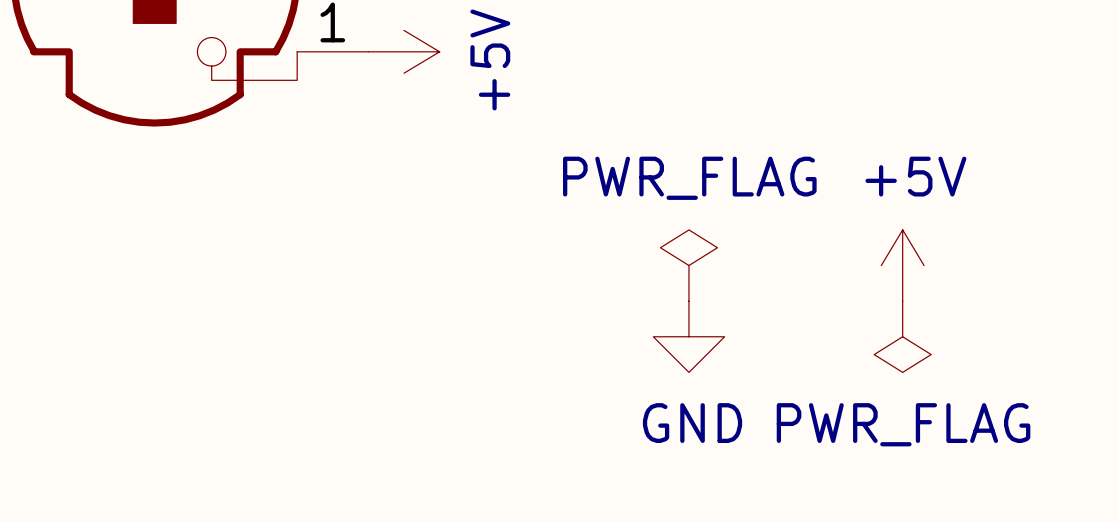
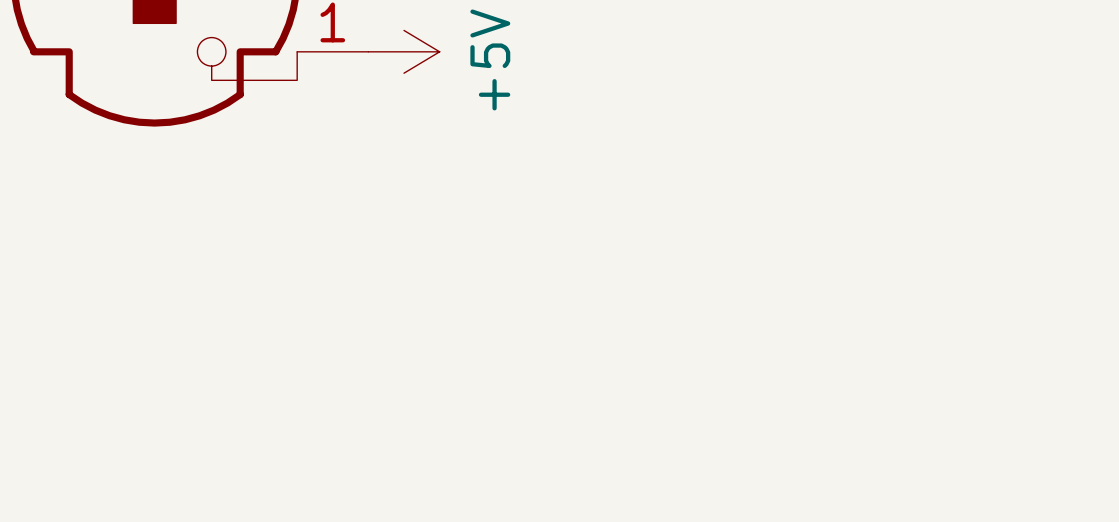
power symbol: PWR_FLAG (688, 265) -> none
power symbol: +5V (902, 265) -> none
power symbol: GND (688, 336) -> none
power symbol: PWR_FLAG (902, 336) -> none

